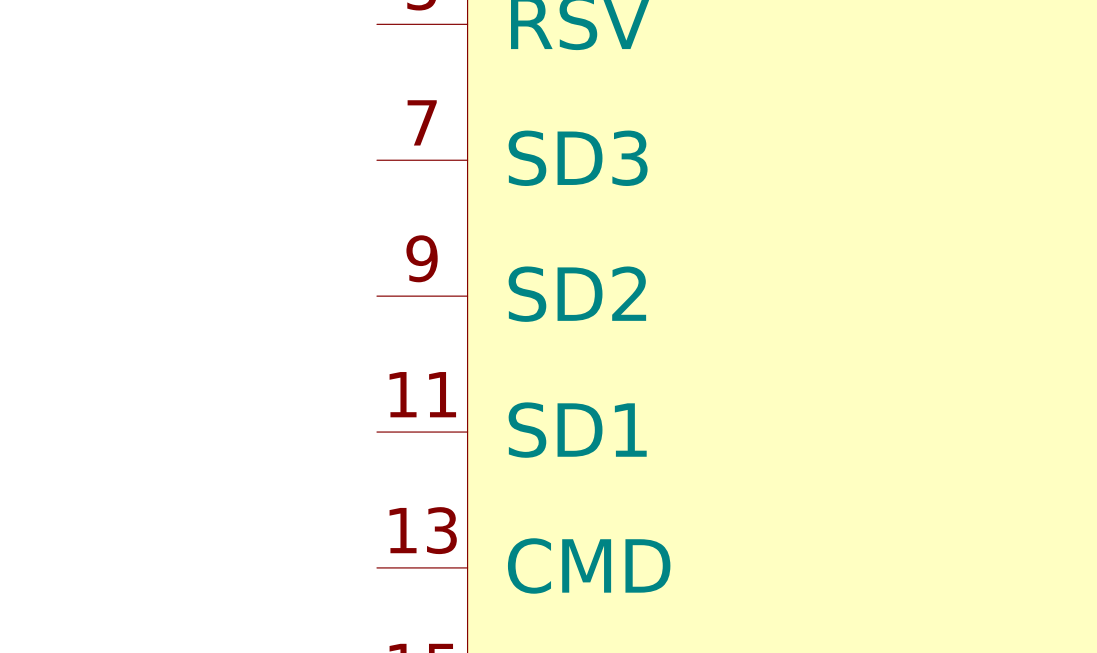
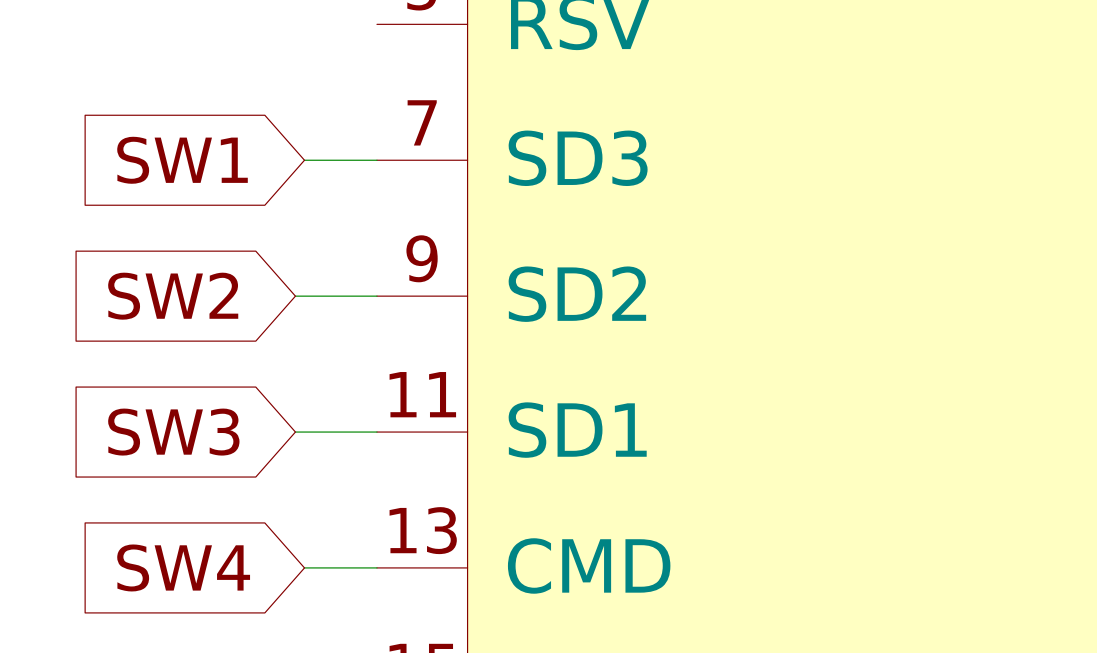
global label: none -> SW1 (182, 160)
wire: none -> (304, 160) (376, 160)
global label: none -> SW2 (173, 296)
wire: none -> (295, 296) (376, 296)
global label: none -> SW3 (173, 432)
wire: none -> (295, 432) (376, 432)
global label: none -> SW4 (183, 567)
wire: none -> (304, 567) (376, 567)

